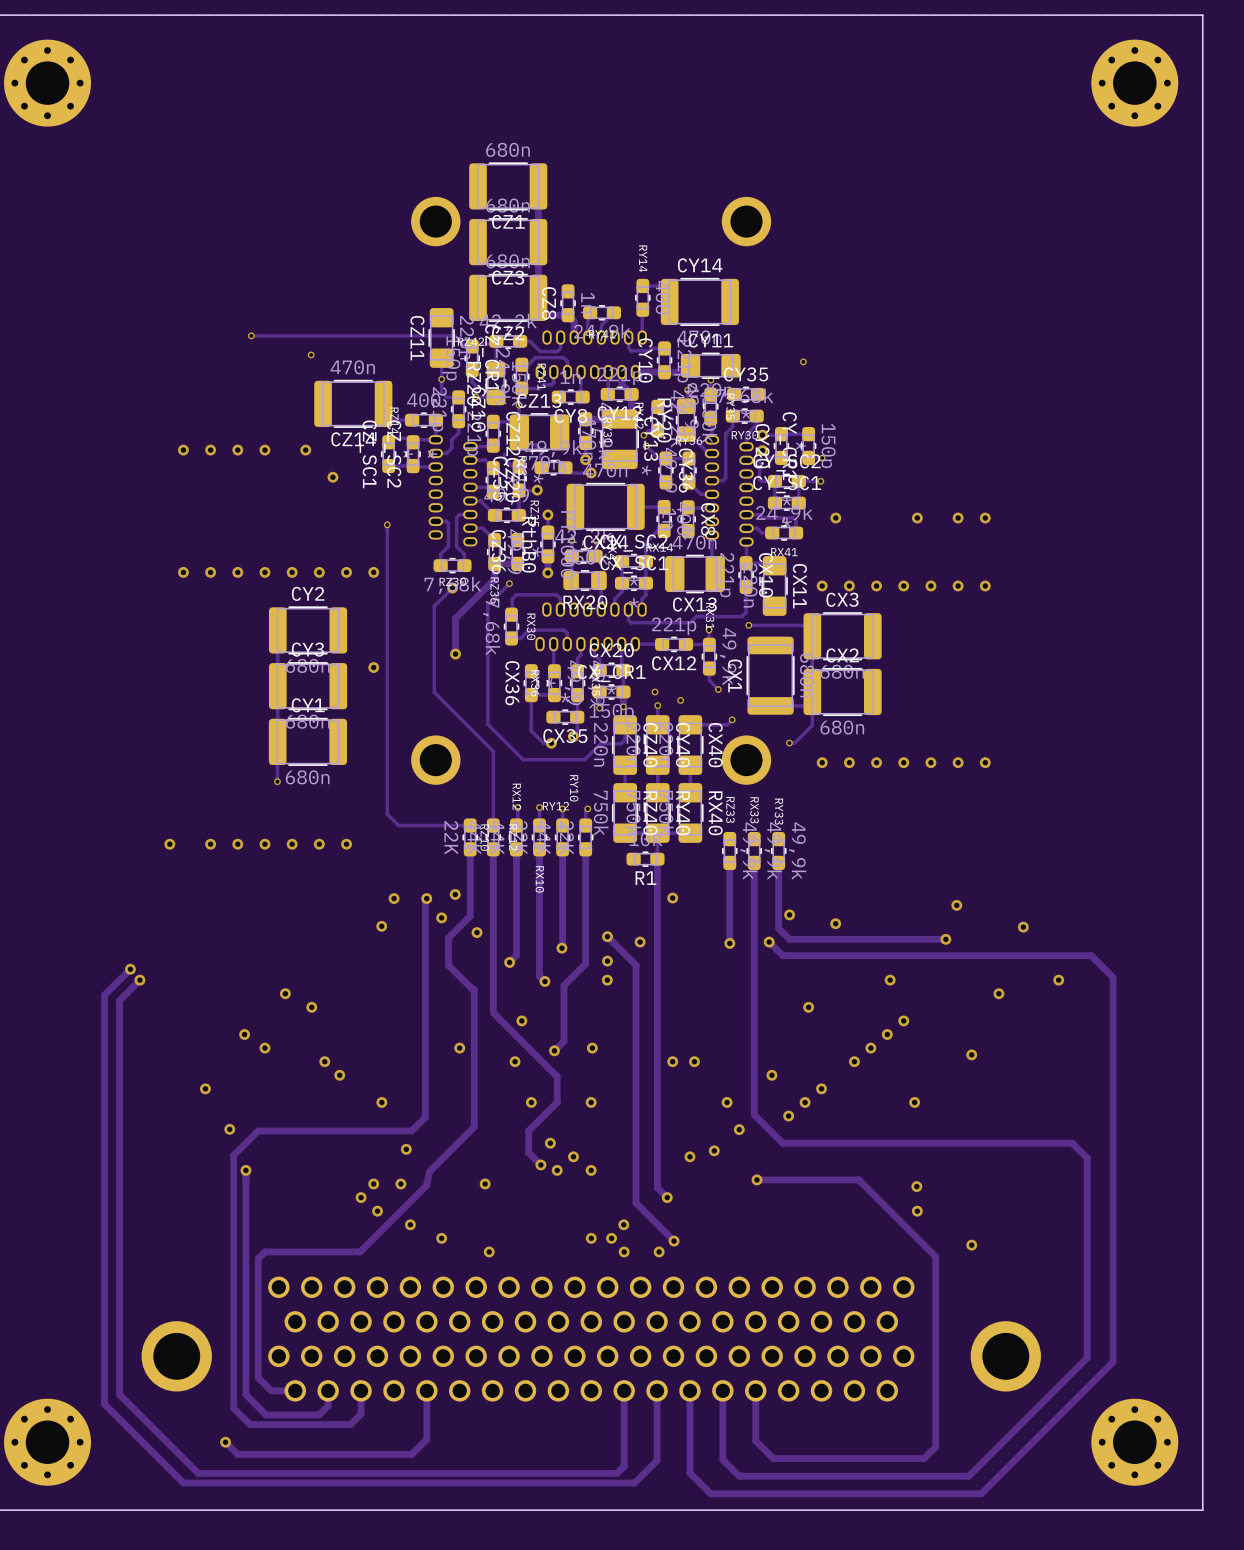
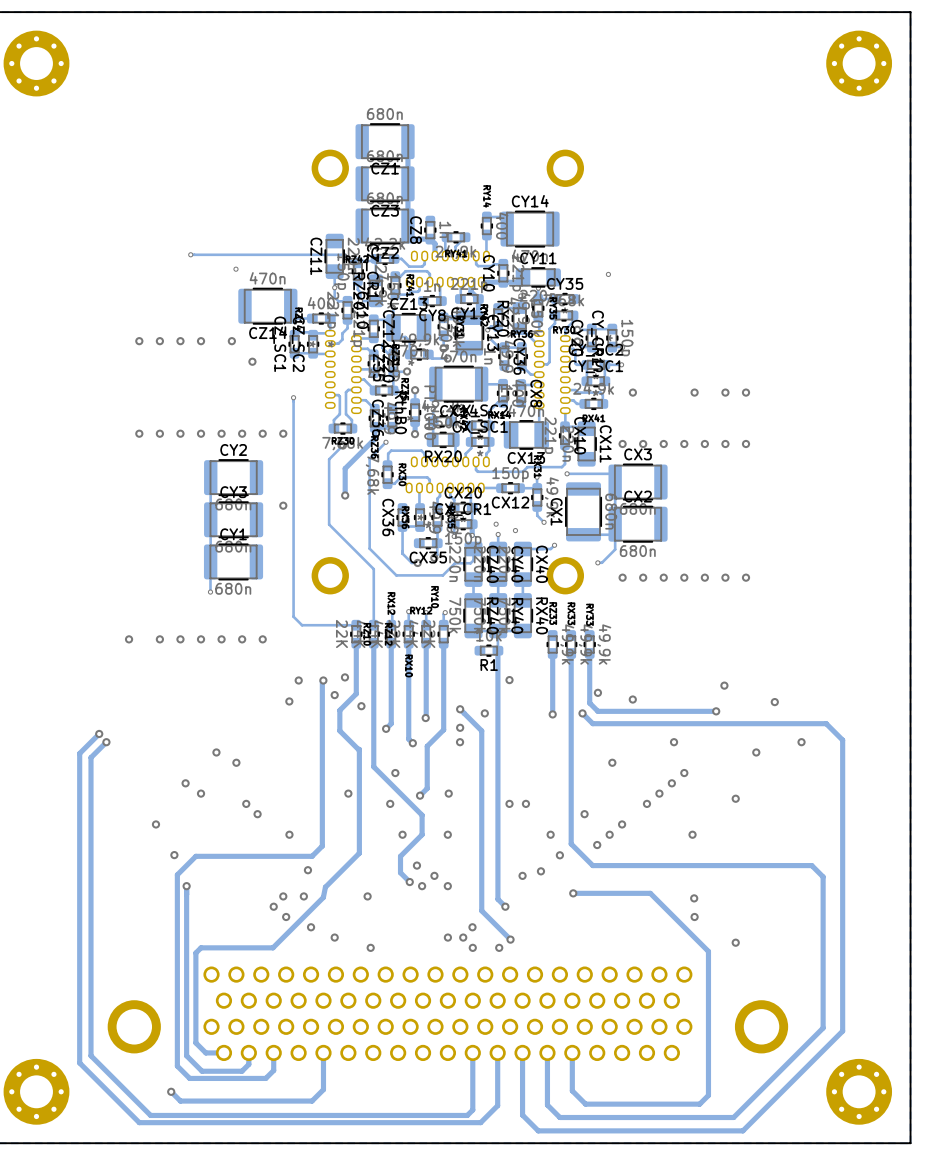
CY36 value: * (646, 470) -> 1n (490, 356)
CX12 value: 221p (674, 626) -> 150p (510, 474)

